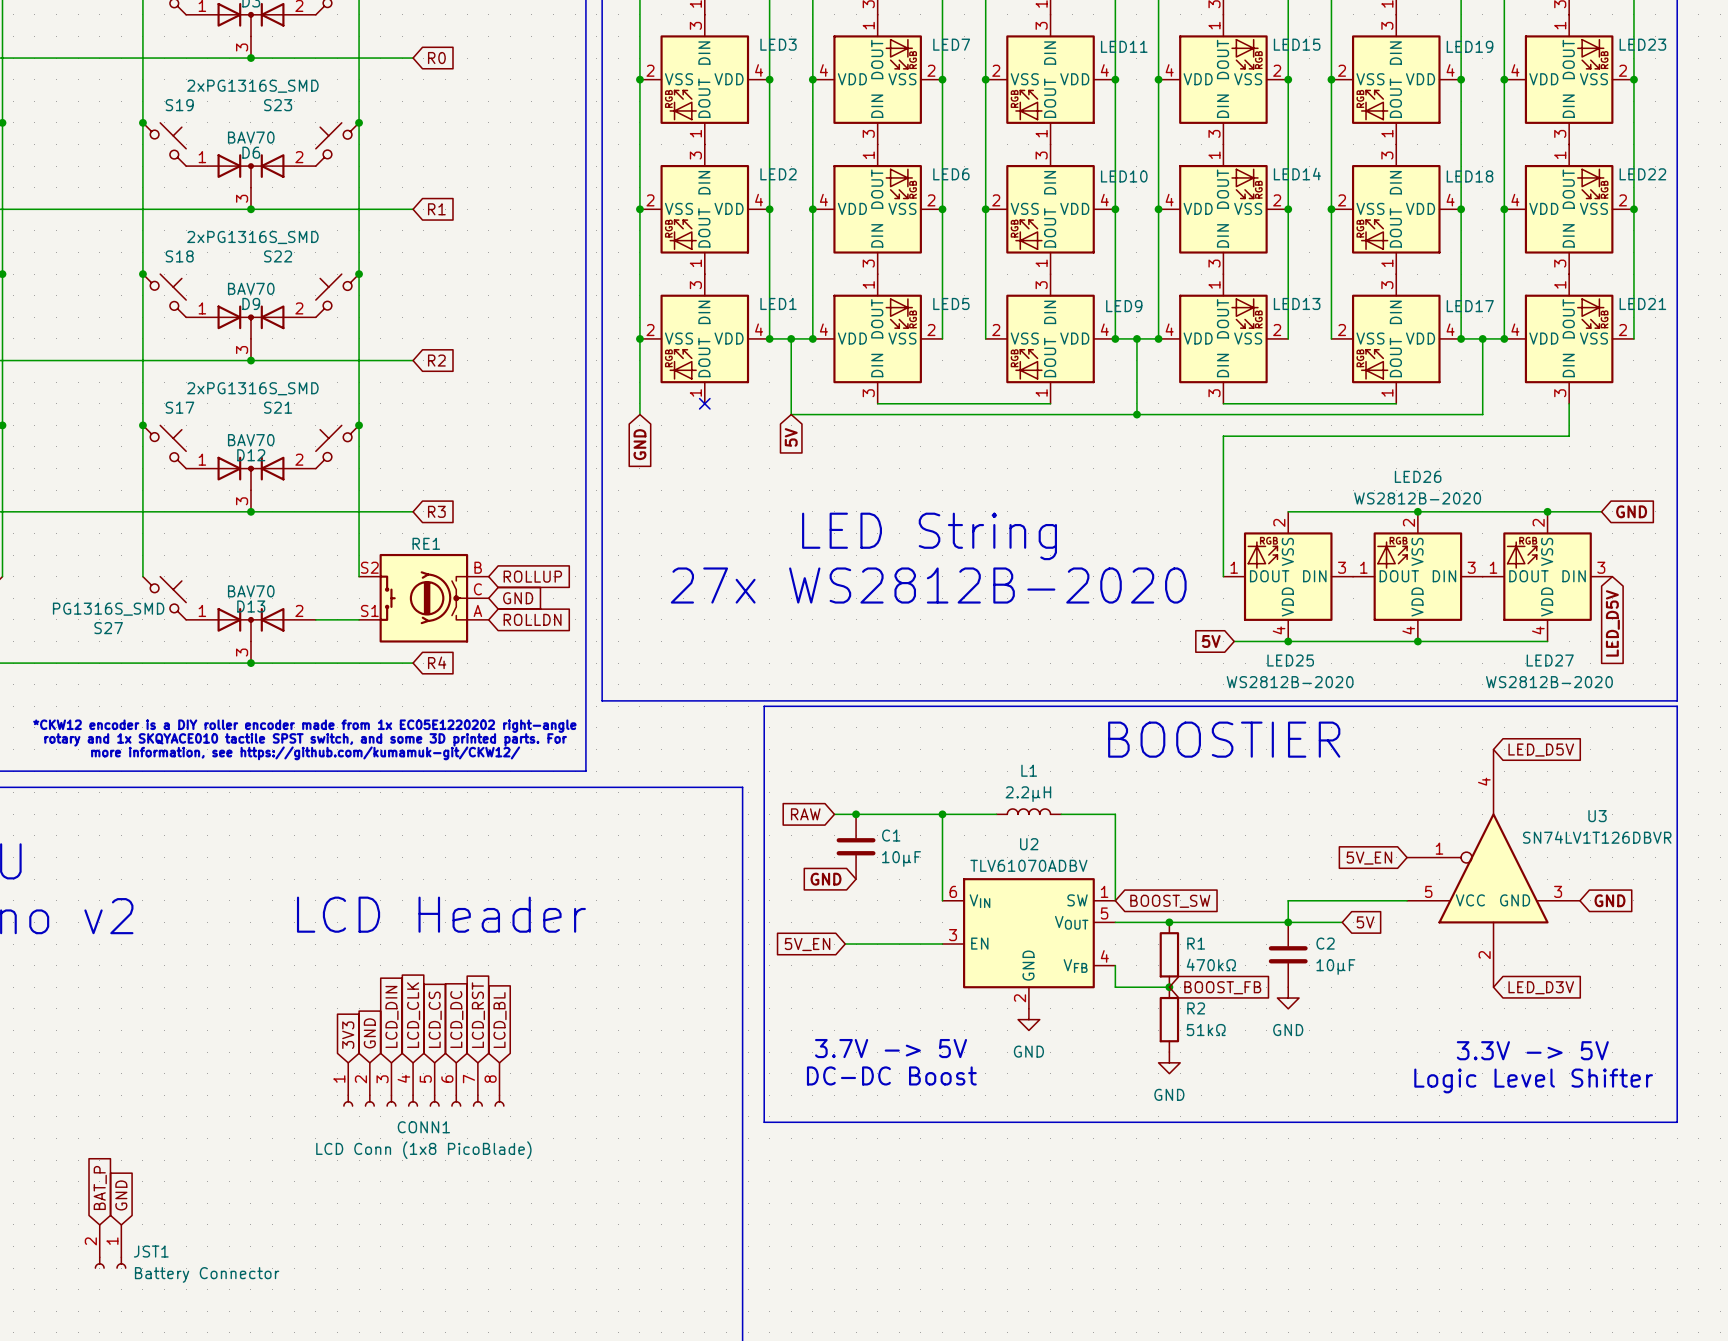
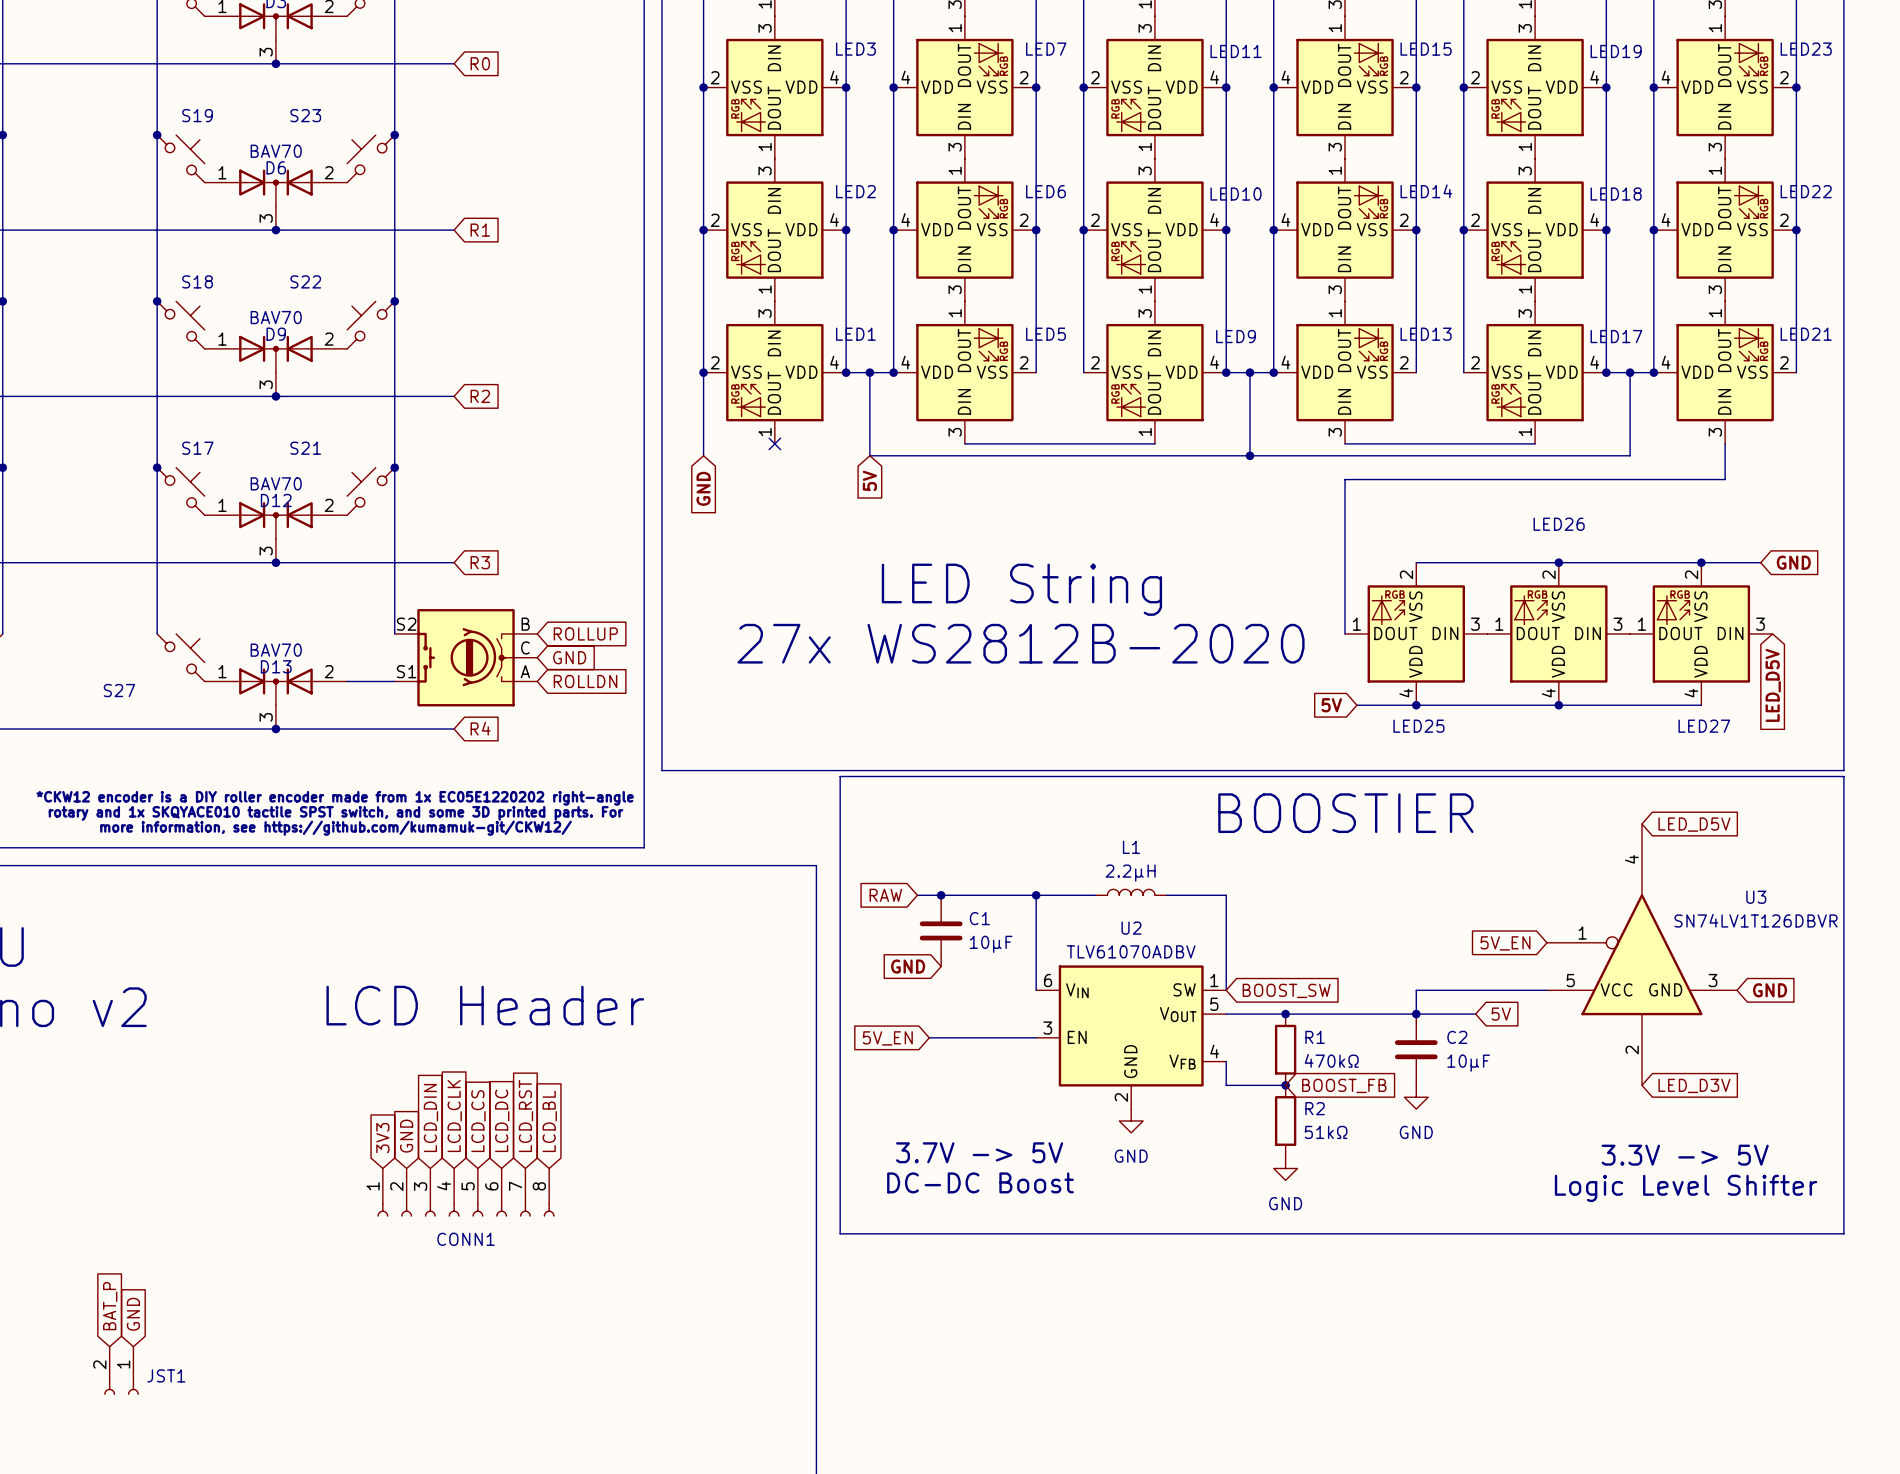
S19 value: 2xPG1316S_SMD (252, 86) -> none
S18 value: 2xPG1316S_SMD (252, 237) -> none
S17 value: 2xPG1316S_SMD (252, 388) -> none
LED26 value: WS2812B-2020 (1417, 498) -> none
part value: RE1 (426, 543) -> none
S27 value: PG1316S_SMD (108, 609) -> none
LED25 value: WS2812B-2020 (1290, 682) -> none
LED27 value: WS2812B-2020 (1549, 682) -> none
CONN1 value: LCD Conn (1x8 PicoBlade) (423, 1150) -> none
JST1 value: Battery Connector (207, 1274) -> none

